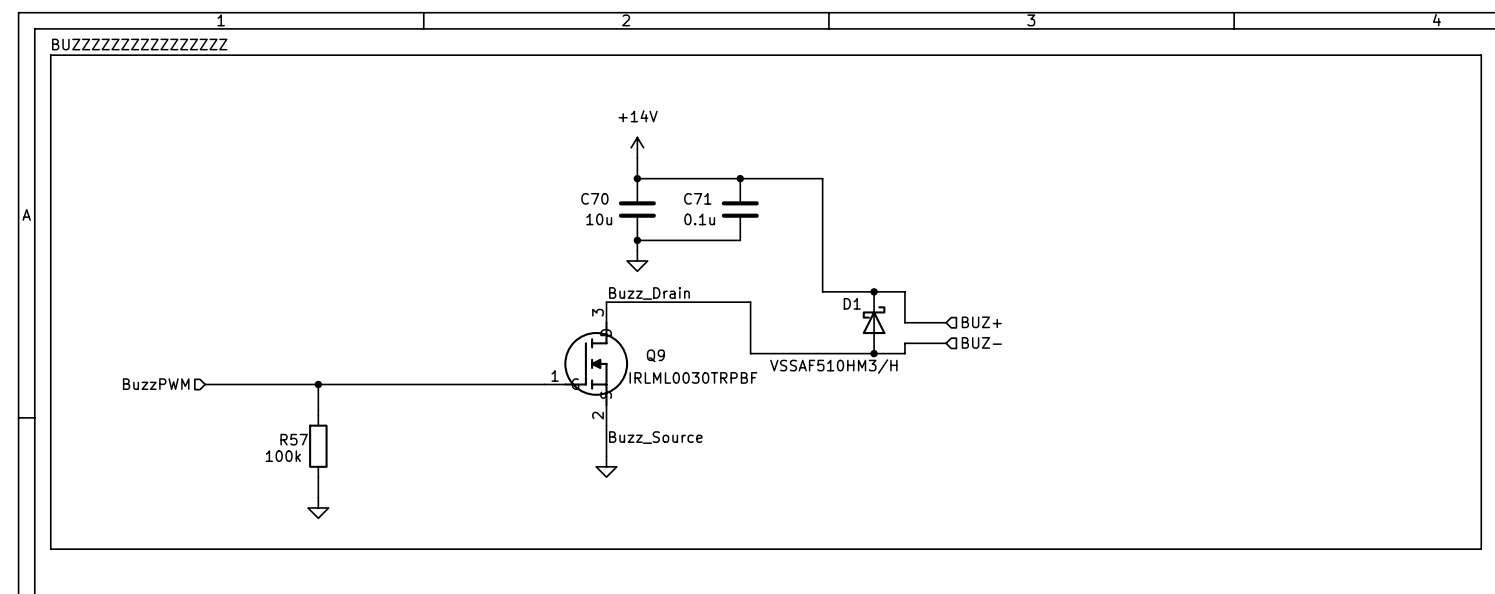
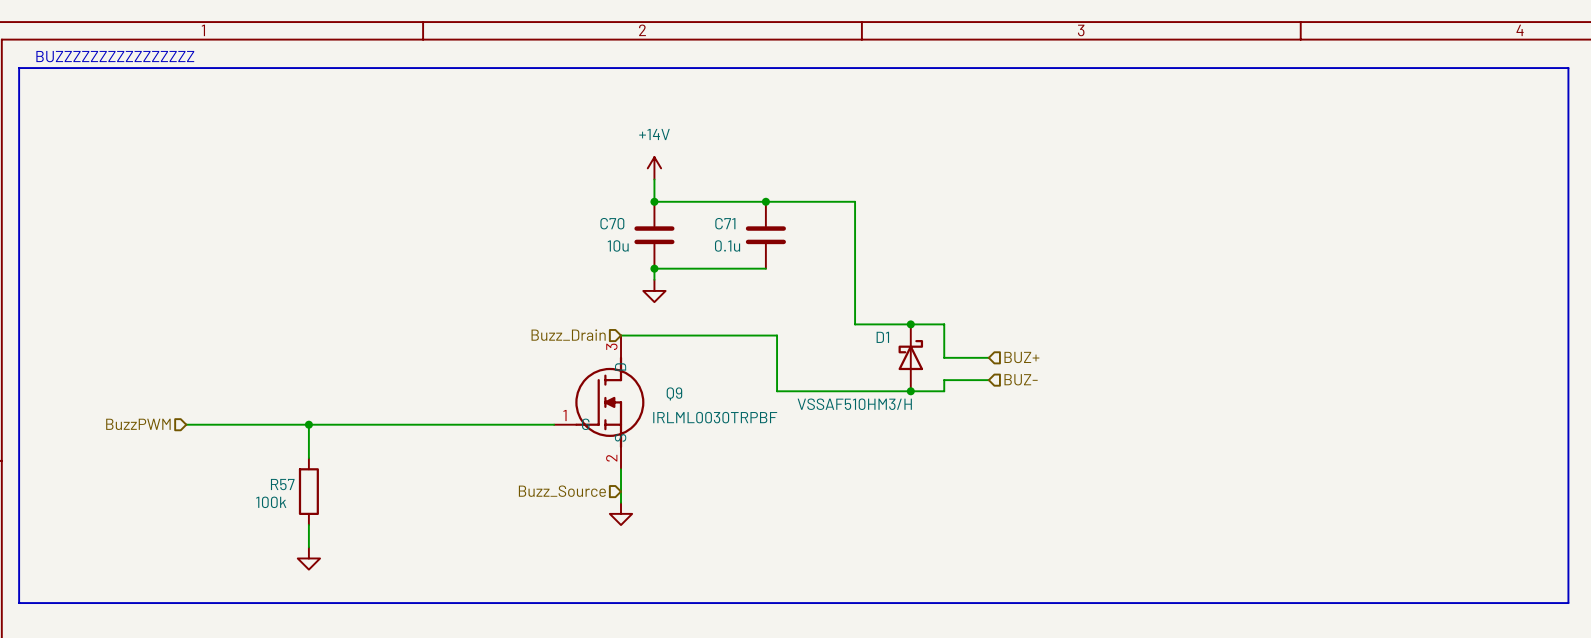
label: Buzz_Drain (649, 293) -> none
hierarchical label: none -> Buzz_Drain (568, 335)
label: Buzz_Source (655, 437) -> none
hierarchical label: none -> Buzz_Source (562, 491)

